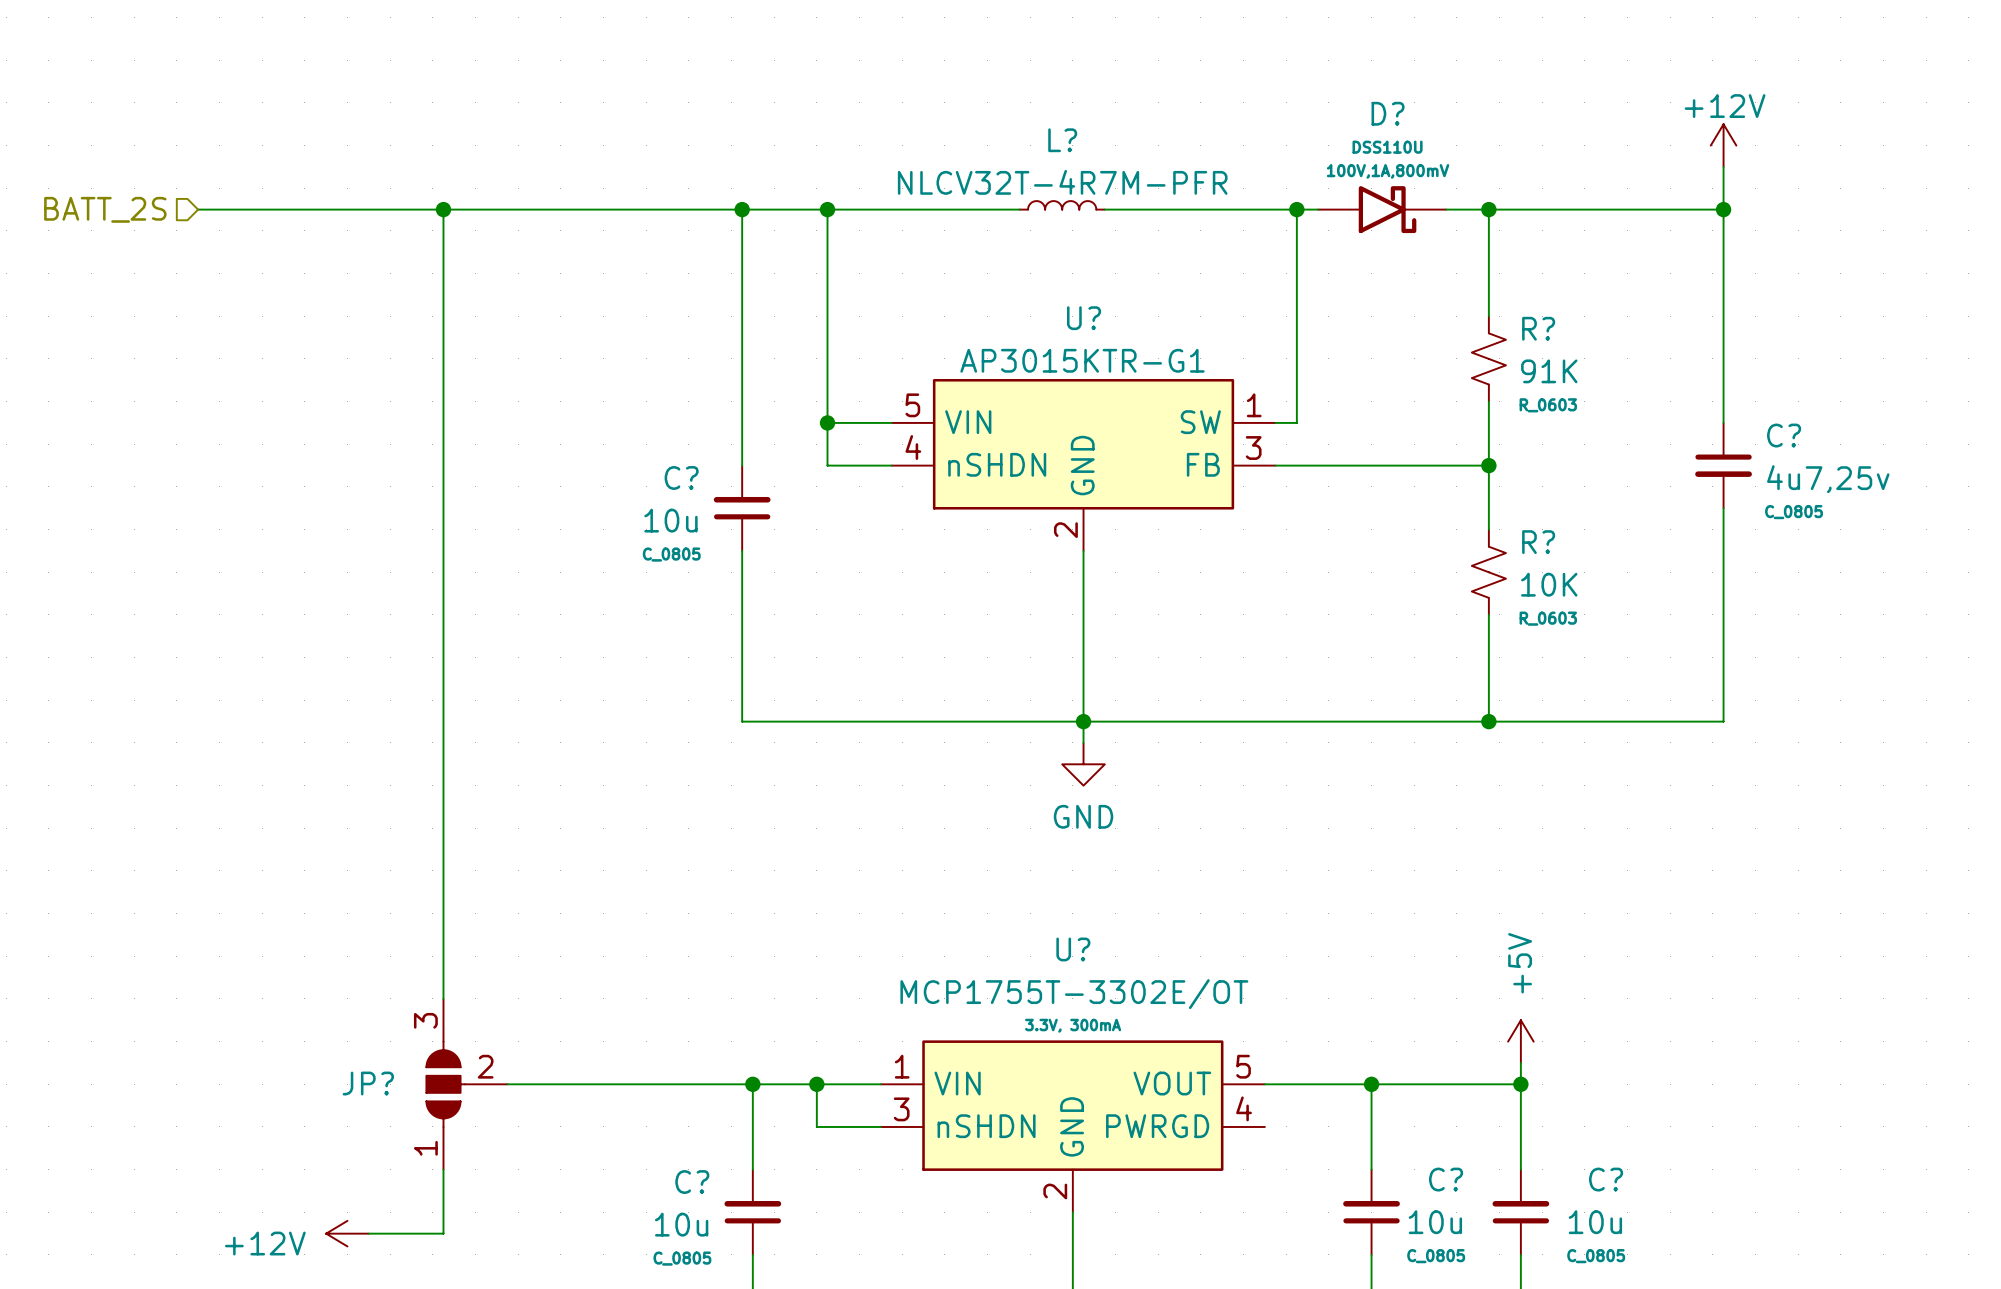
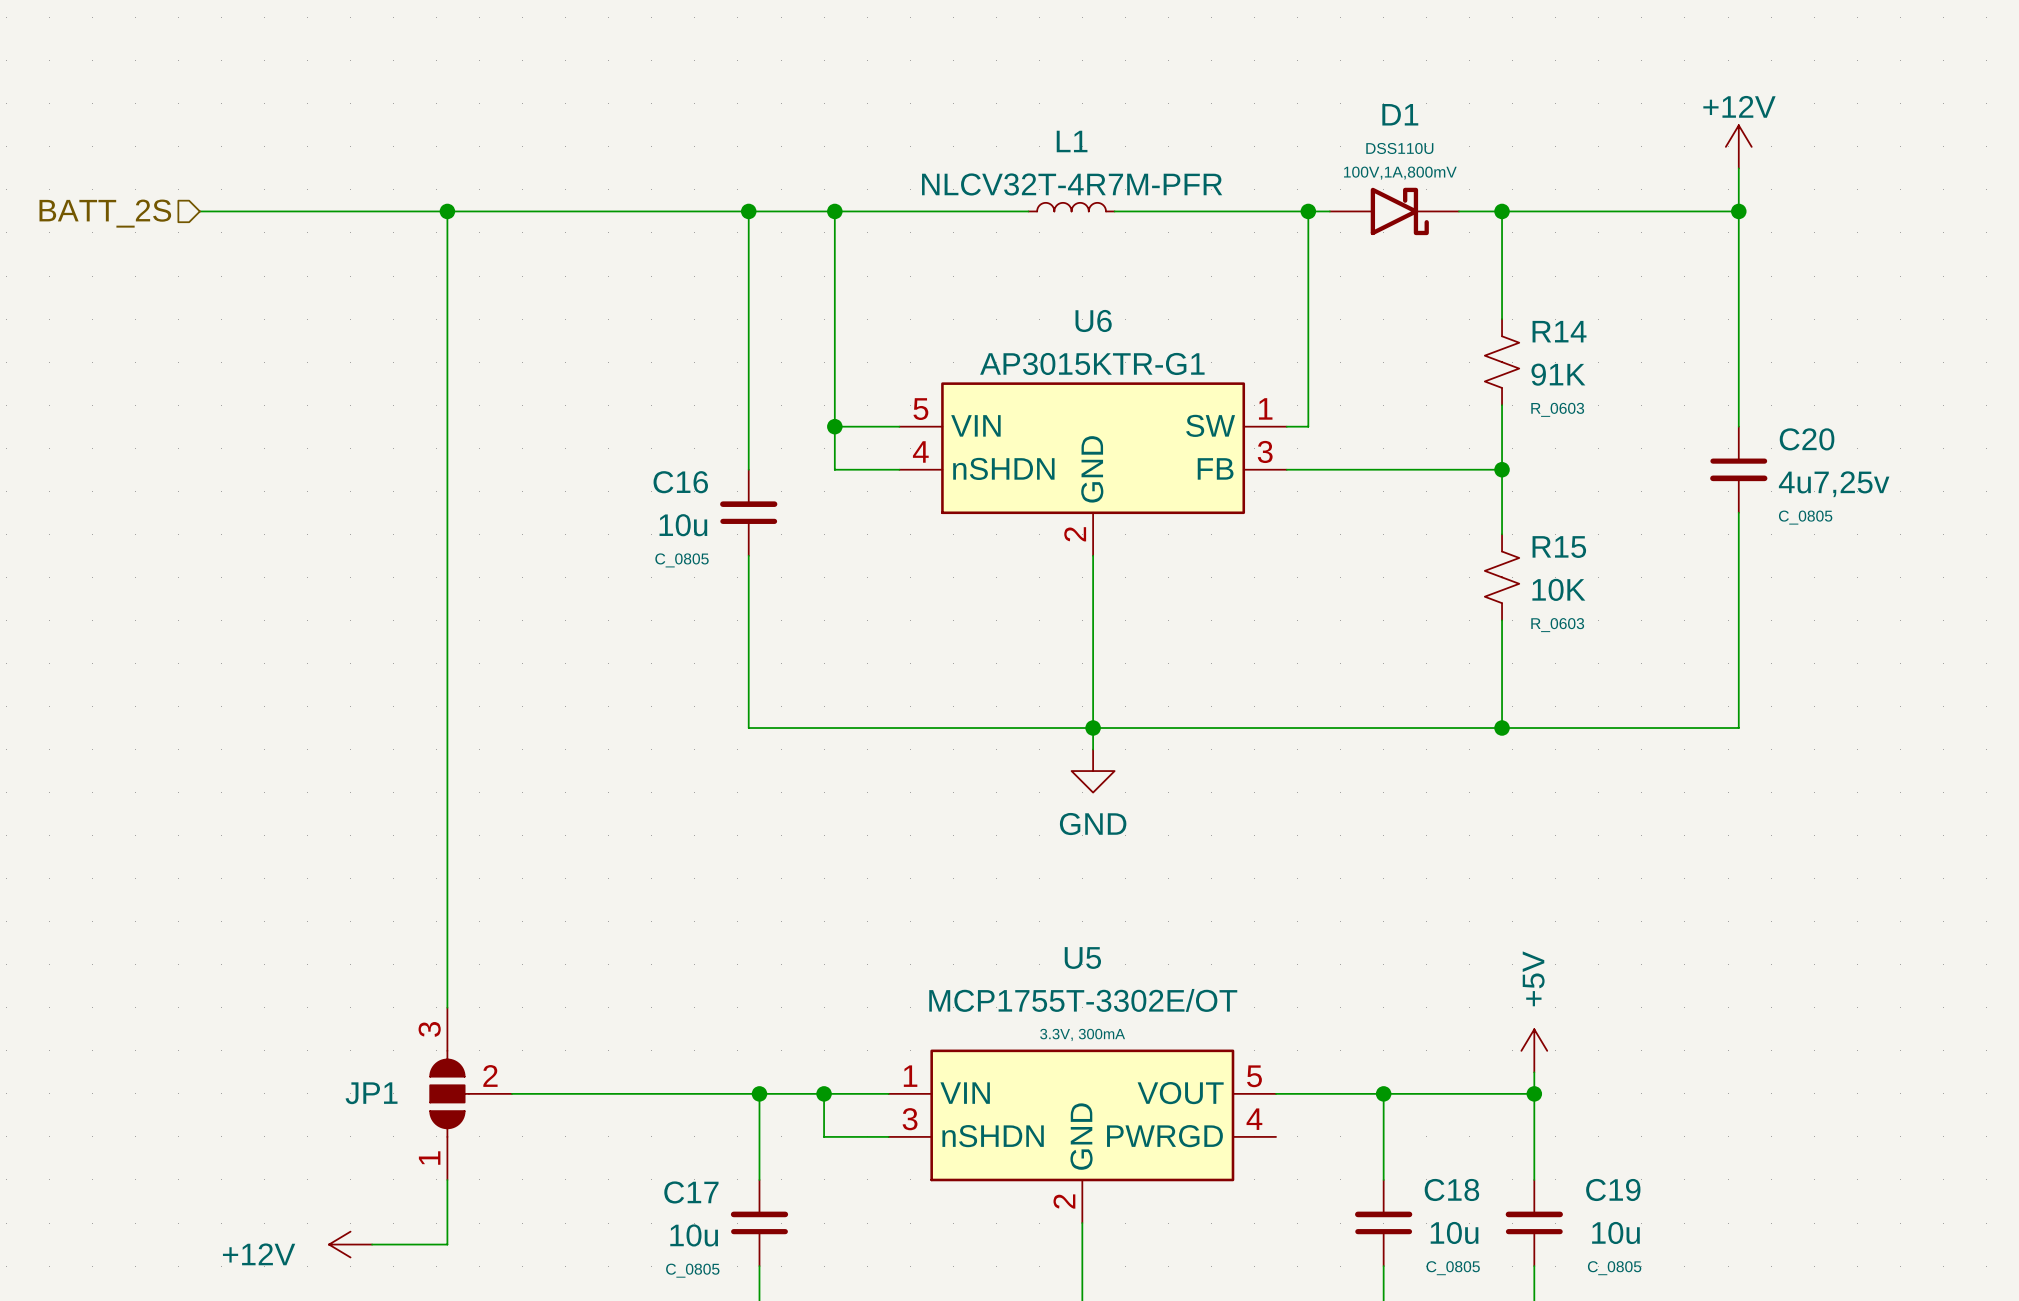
D? name: D? (1388, 113) -> D1 (1400, 114)
L? name: L? (1062, 140) -> L1 (1072, 141)
U? name: U? (1084, 318) -> U6 (1093, 320)
R? name: R? (1538, 328) -> R14 (1559, 331)
C? name: C? (1784, 435) -> C20 (1807, 439)
C? name: C? (681, 477) -> C16 (680, 482)
R? name: R? (1538, 542) -> R15 (1559, 547)
U? name: U? (1073, 949) -> U5 (1082, 958)
JP? name: JP? (368, 1083) -> JP1 (371, 1093)
C? name: C? (1446, 1179) -> C18 (1451, 1189)
C? name: C? (1606, 1179) -> C19 (1613, 1189)
C? name: C? (692, 1182) -> C17 (691, 1192)

